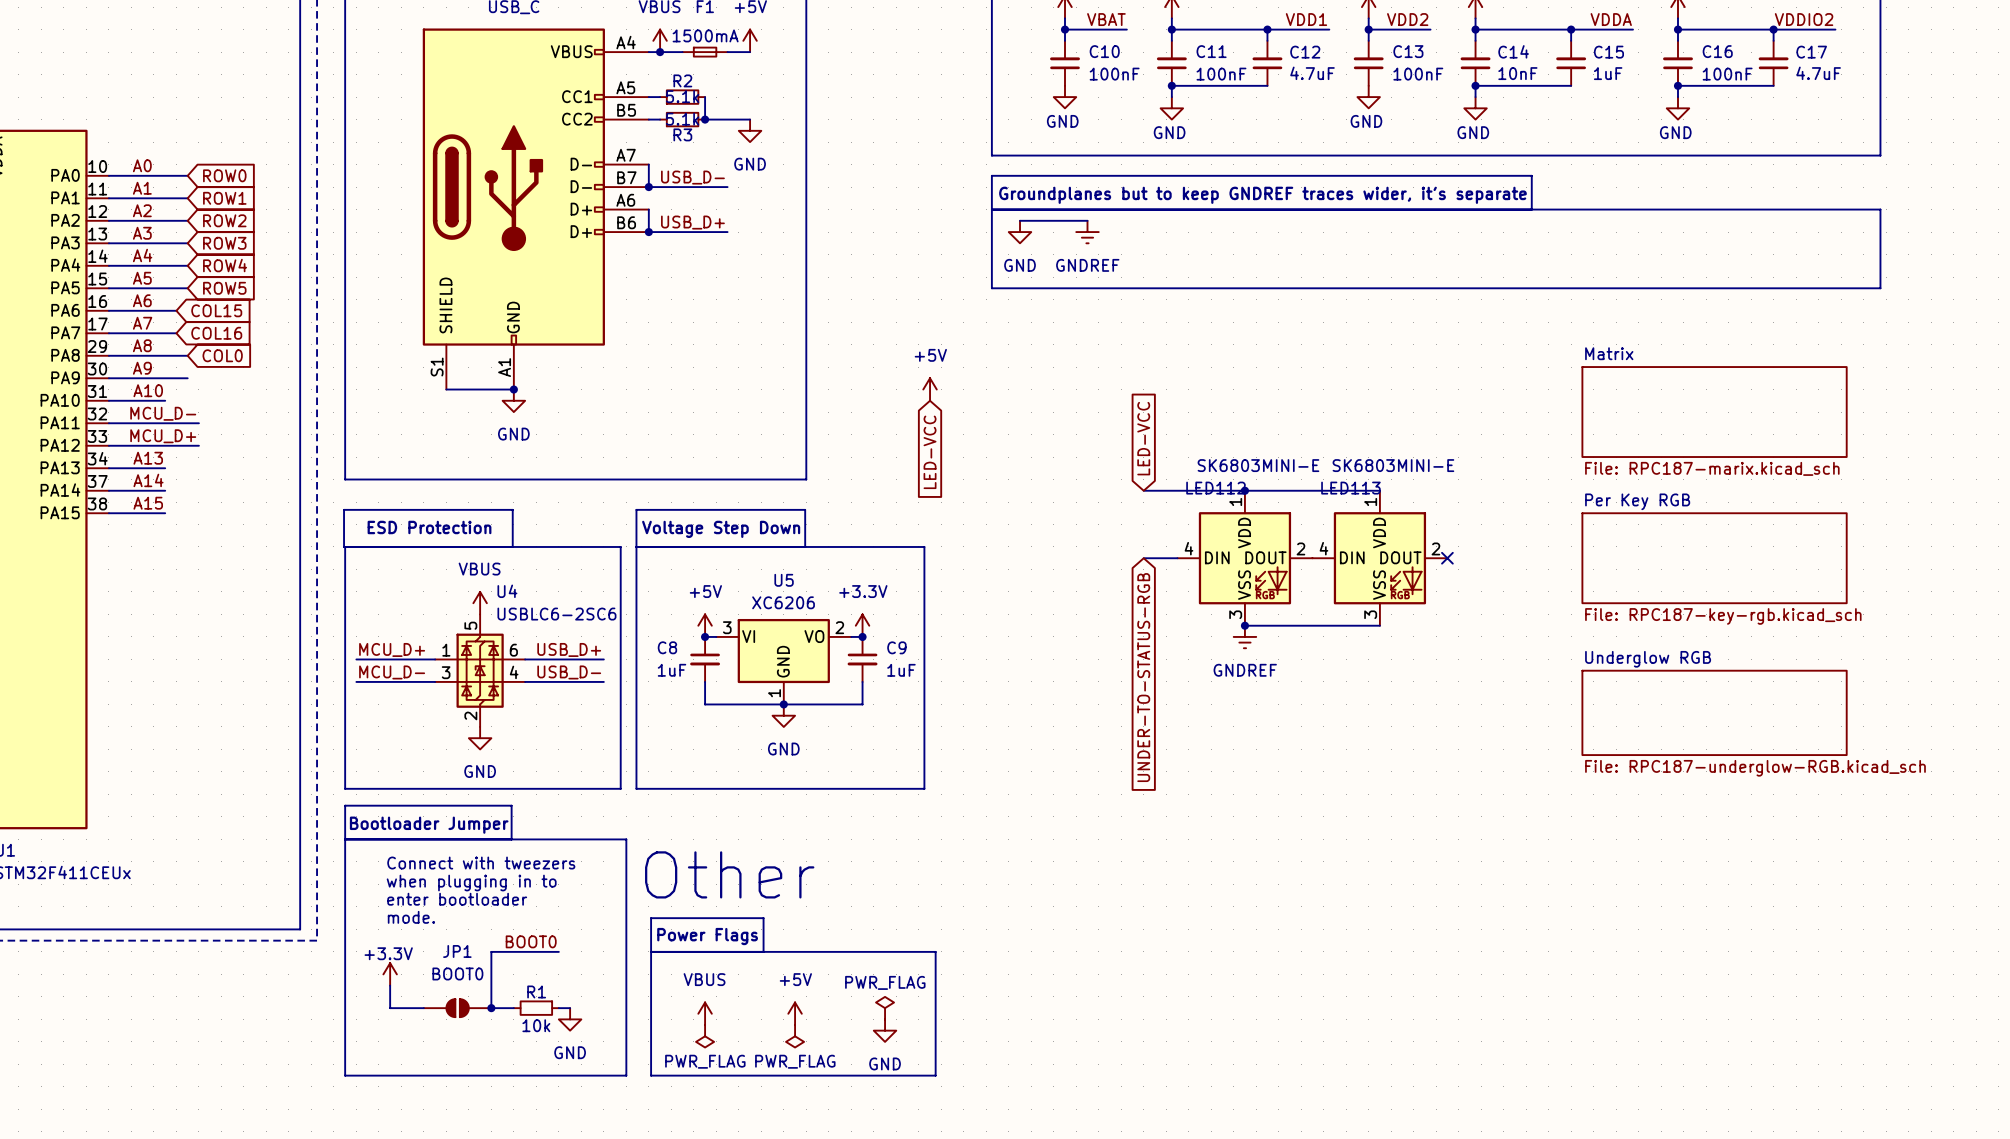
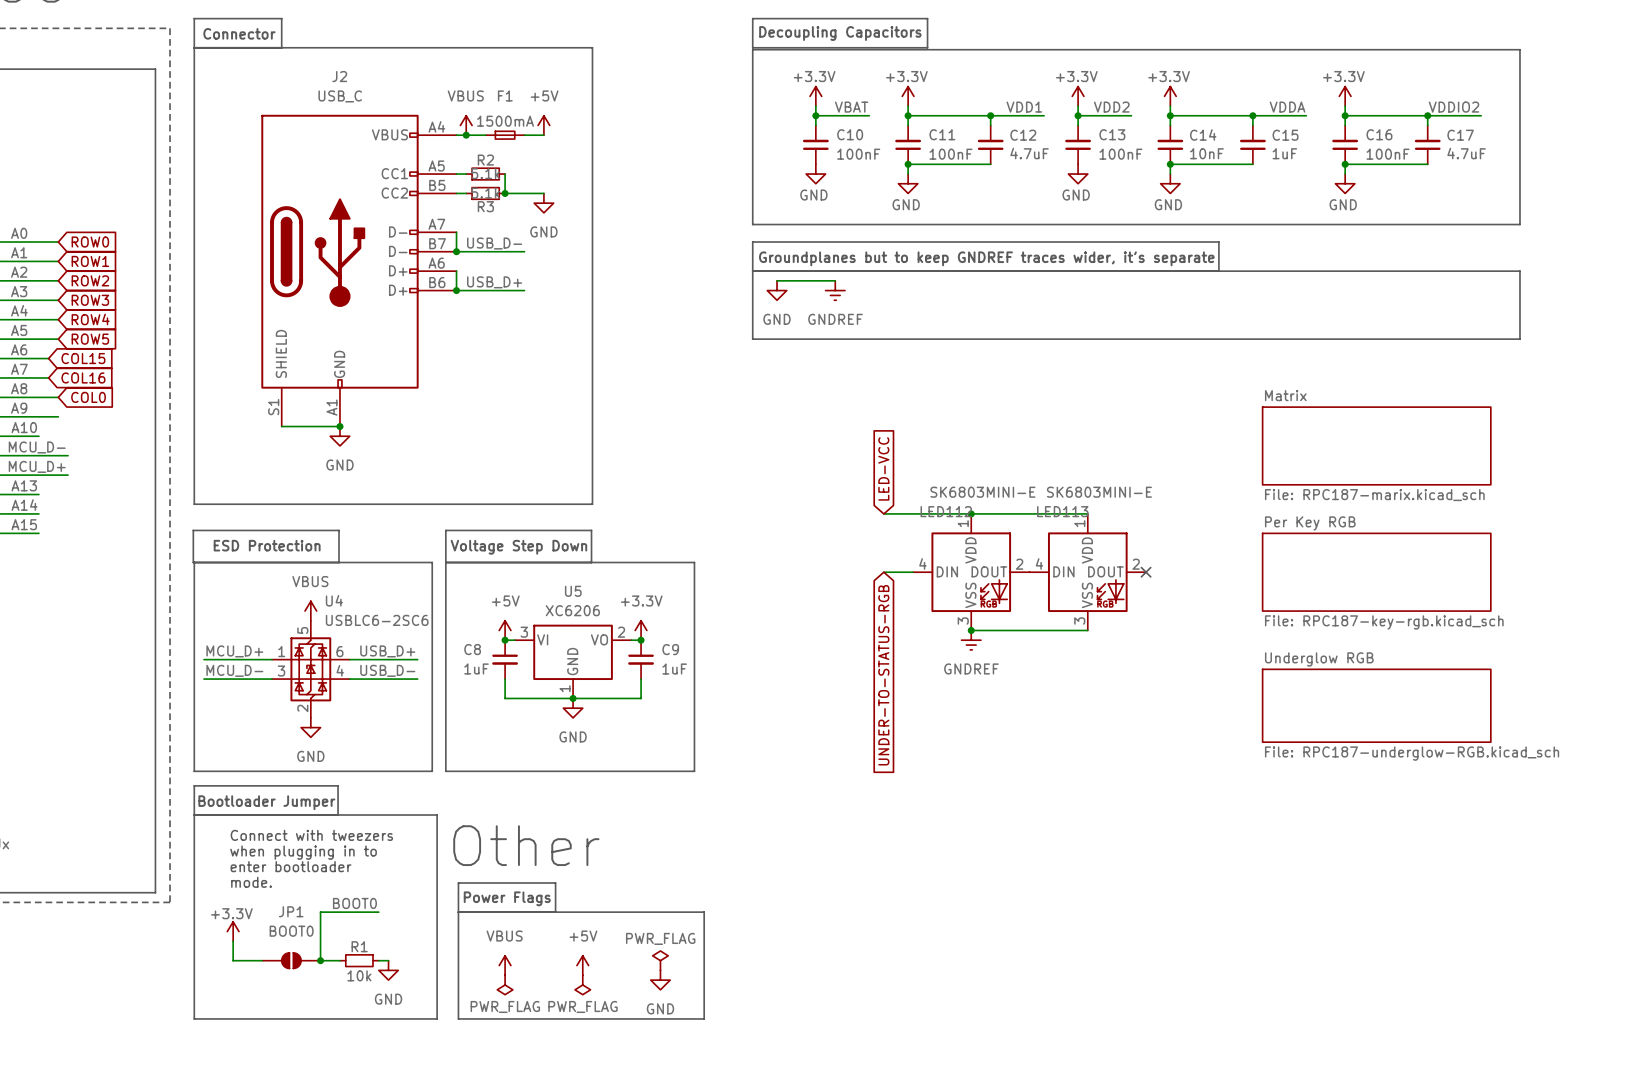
power symbol: +5V (930, 389) -> none
global label: LED-VCC (930, 452) -> none

